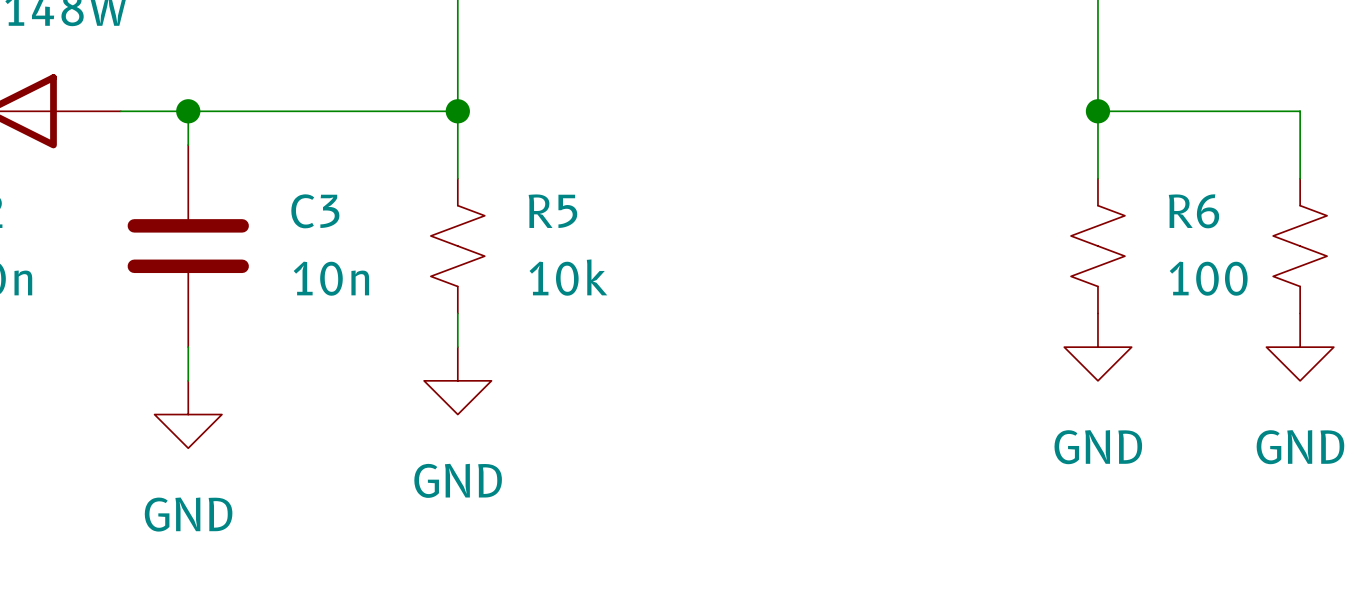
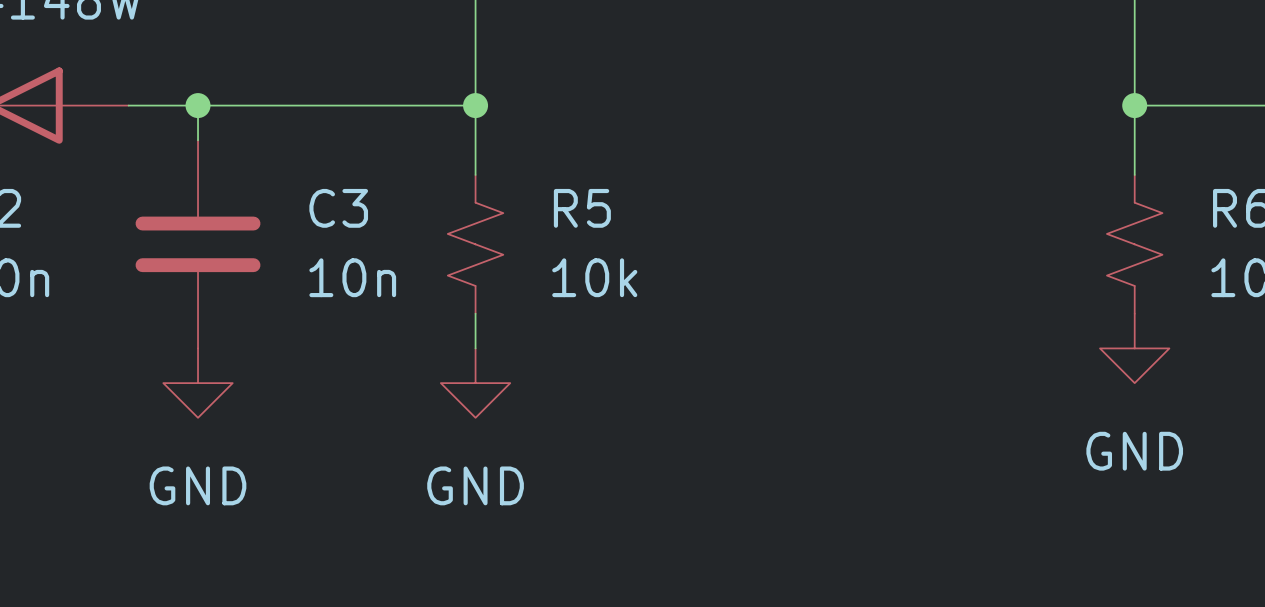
power symbol position: GND (188, 414) -> GND (198, 383)

